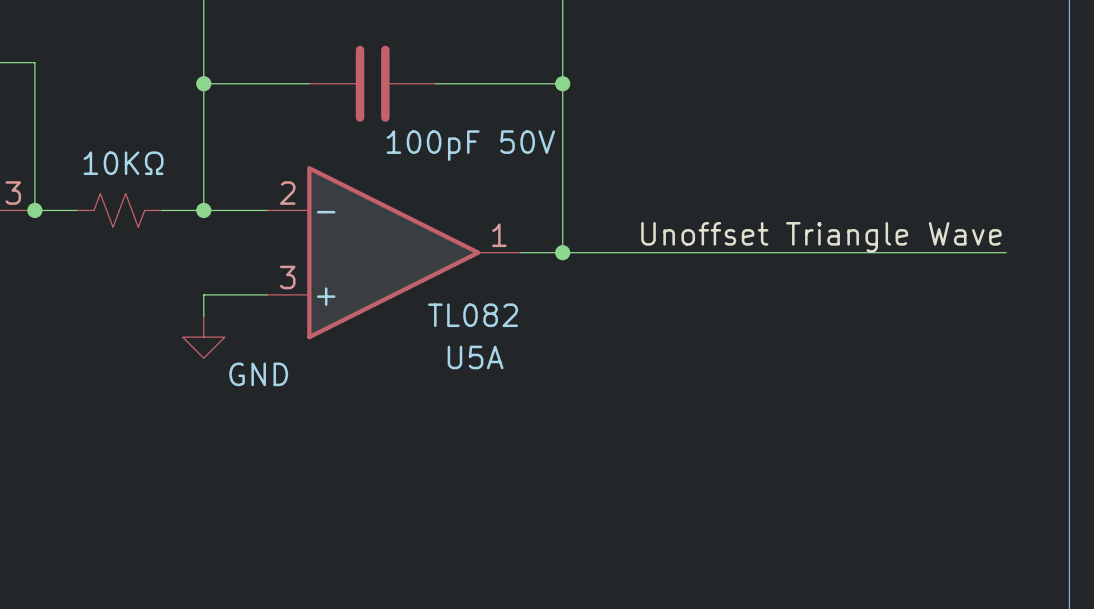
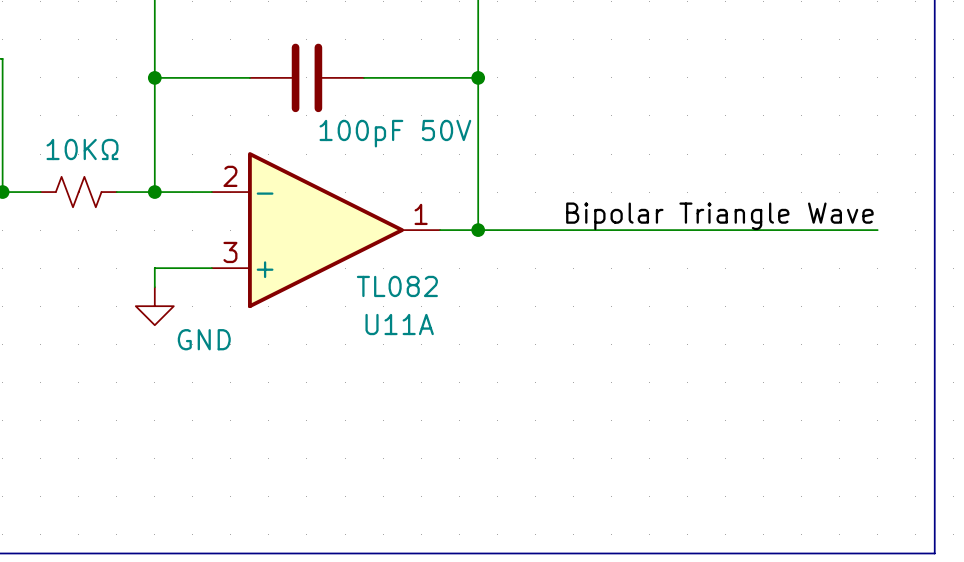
label: Unoffset Triangle Wave (821, 237) -> Bipolar Triangle Wave (719, 216)
U5A name: U5A (475, 357) -> U11A (399, 324)

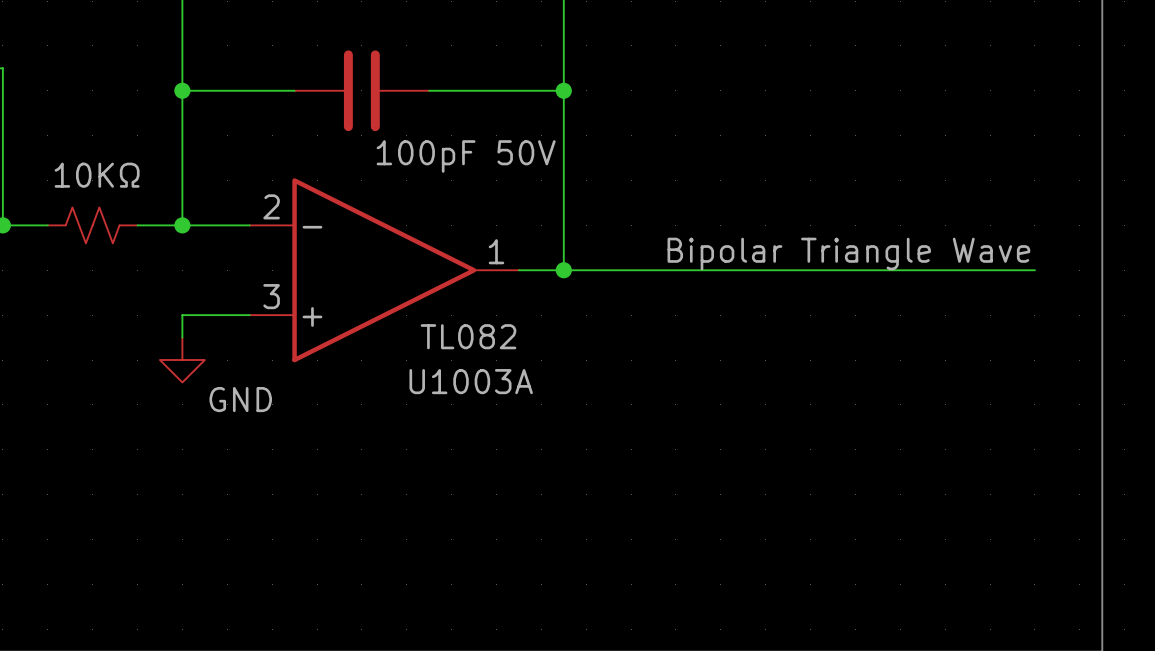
U11A name: U11A (399, 324) -> U1003A (471, 381)

